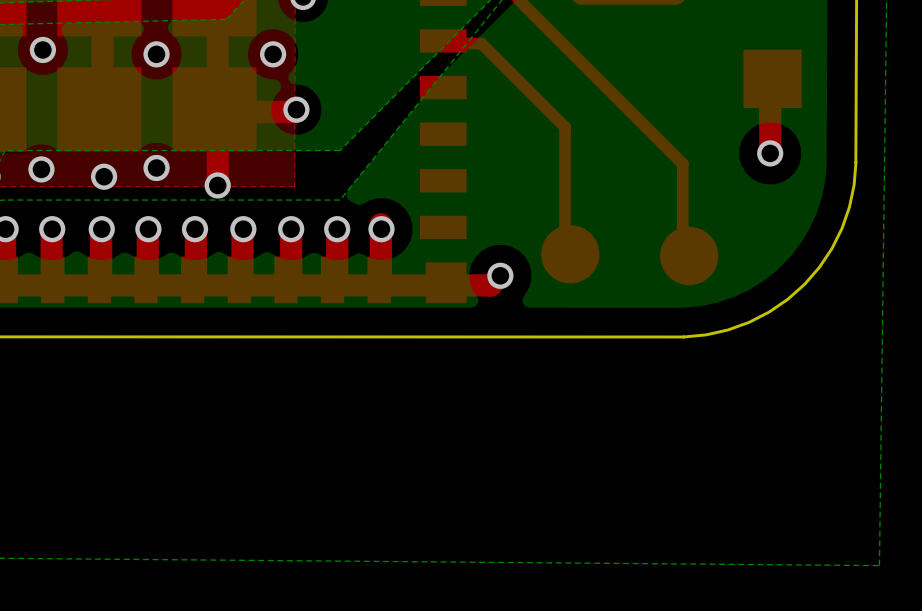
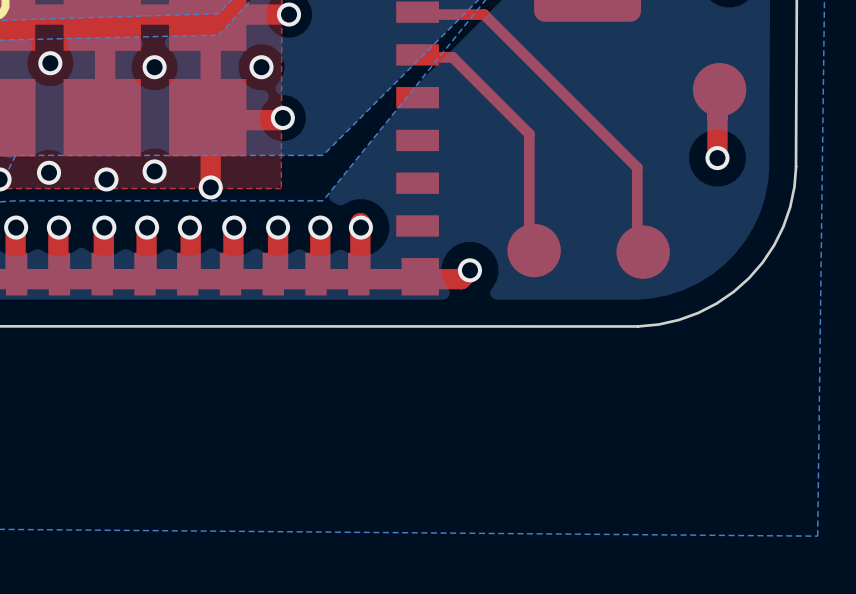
part footprint: [743, 49, 802, 108] -> [692, 62, 747, 117]

